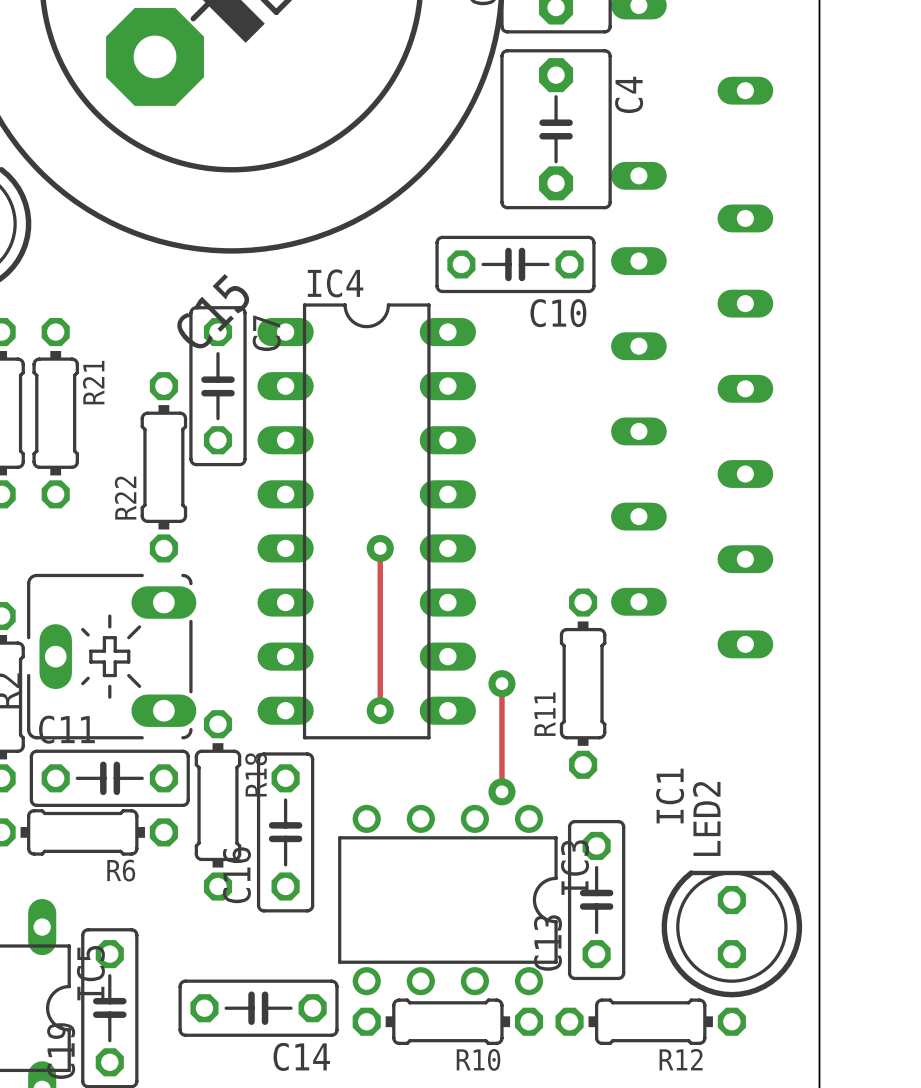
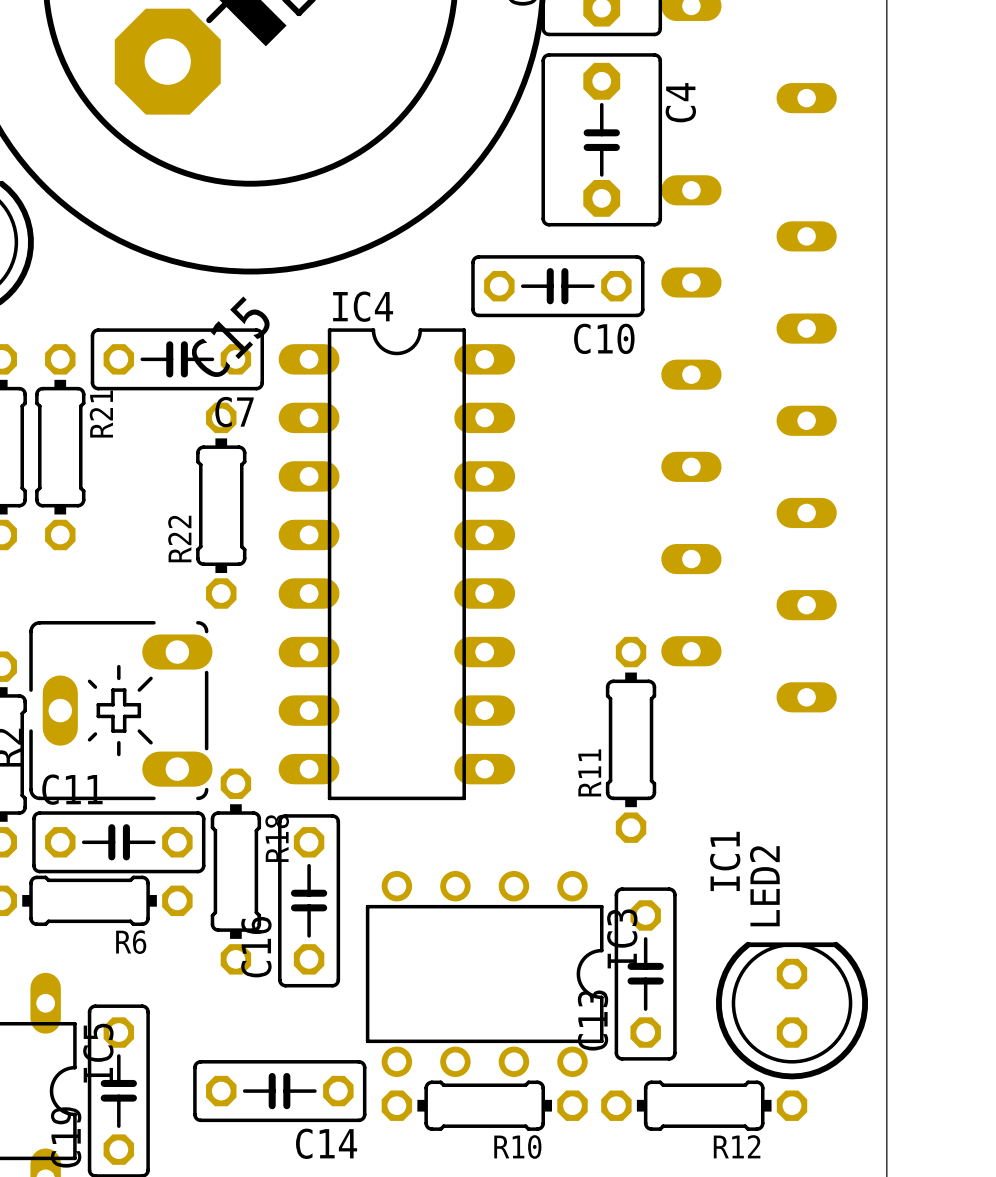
C7 rotation: 0° (217, 386) -> 90° clockwise (177, 359)
R22 position: (163, 467) -> (221, 505)
track: (380, 548) (380, 710) -> none
via: (380, 548) -> none
track: (501, 683) (501, 791) -> none
via: (501, 683) -> none
via: (380, 710) -> none
via: (501, 791) -> none

